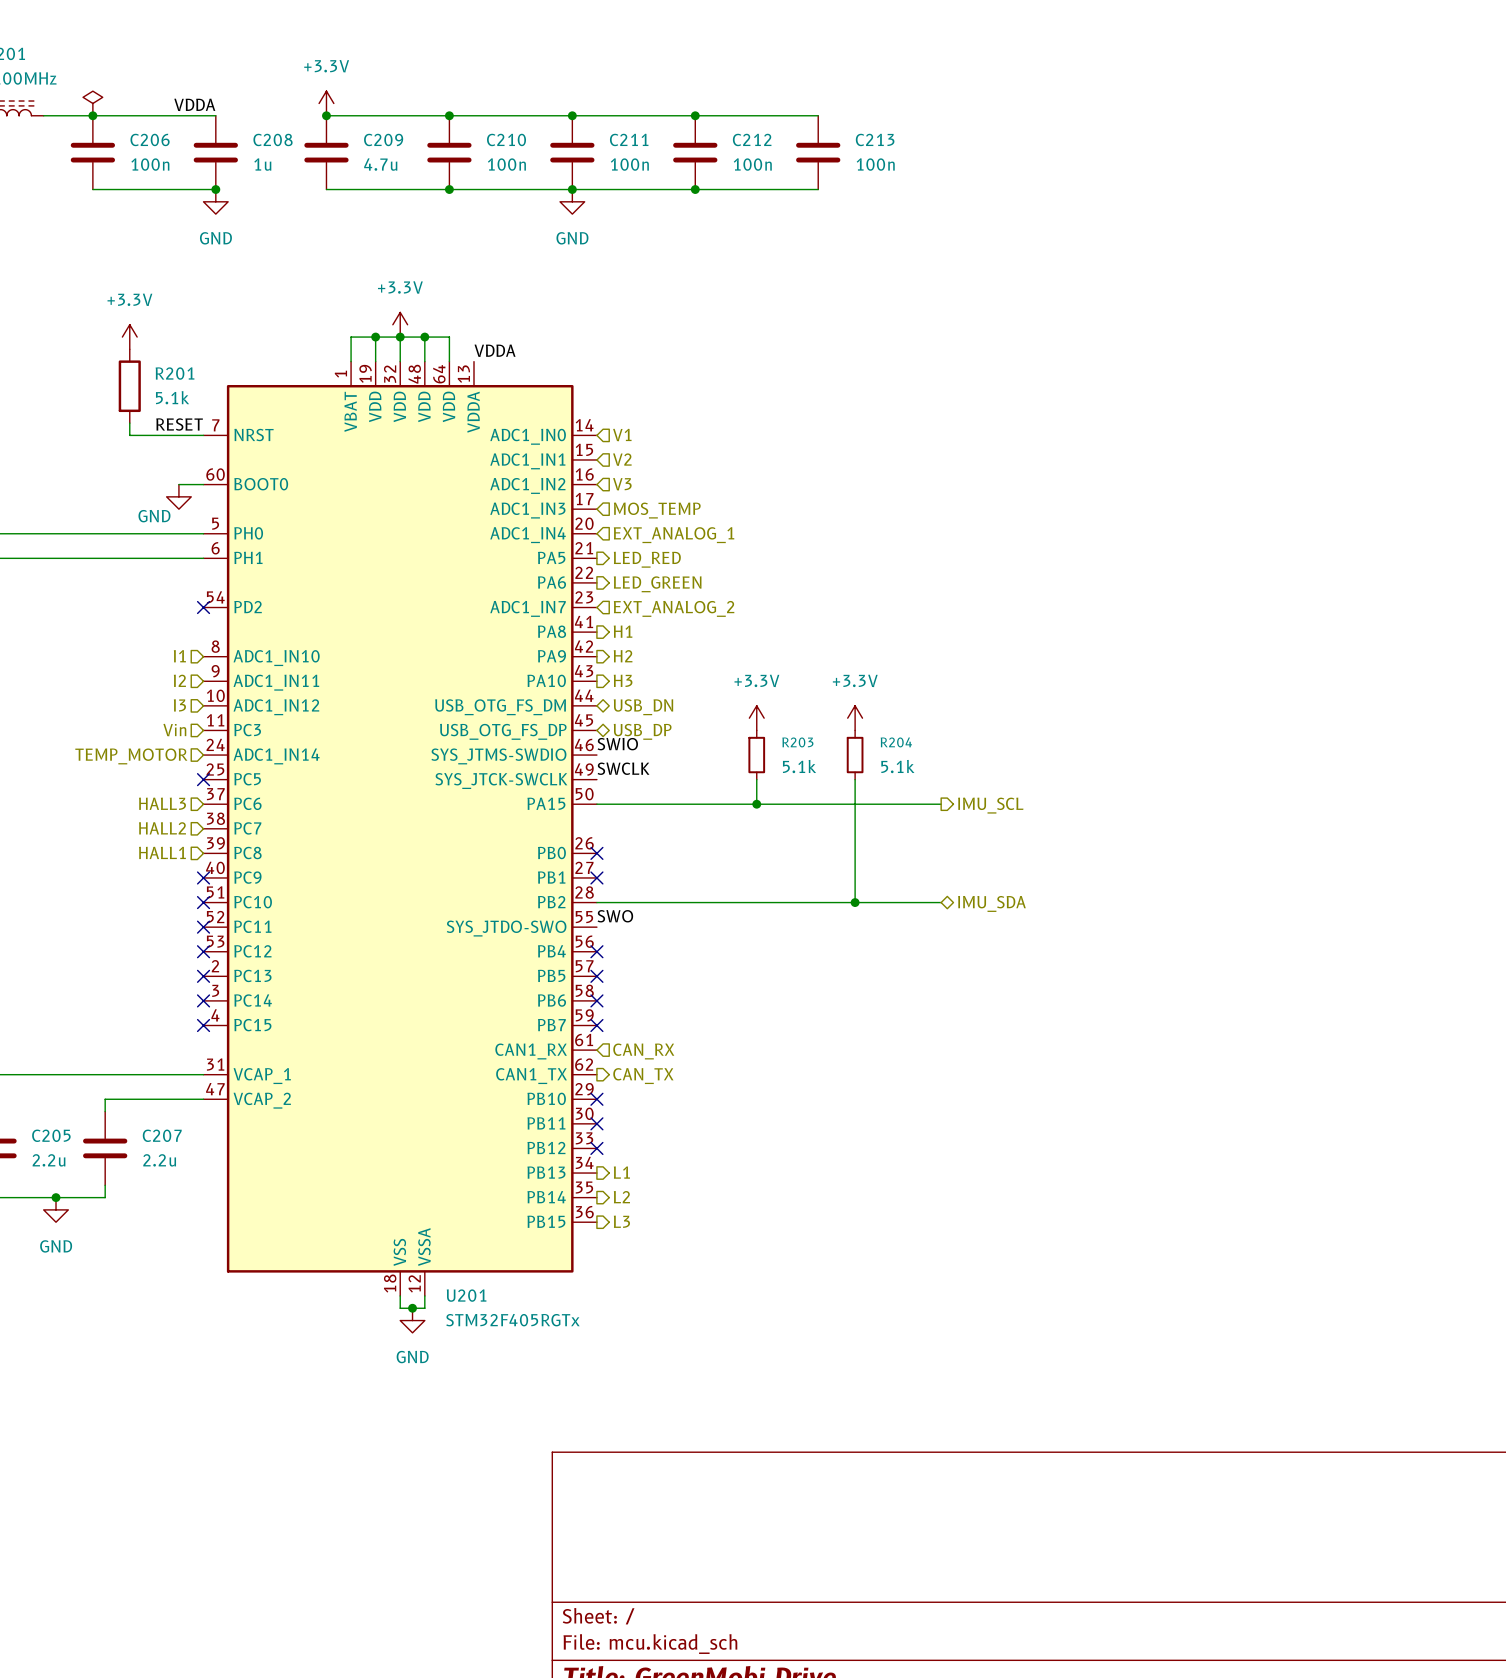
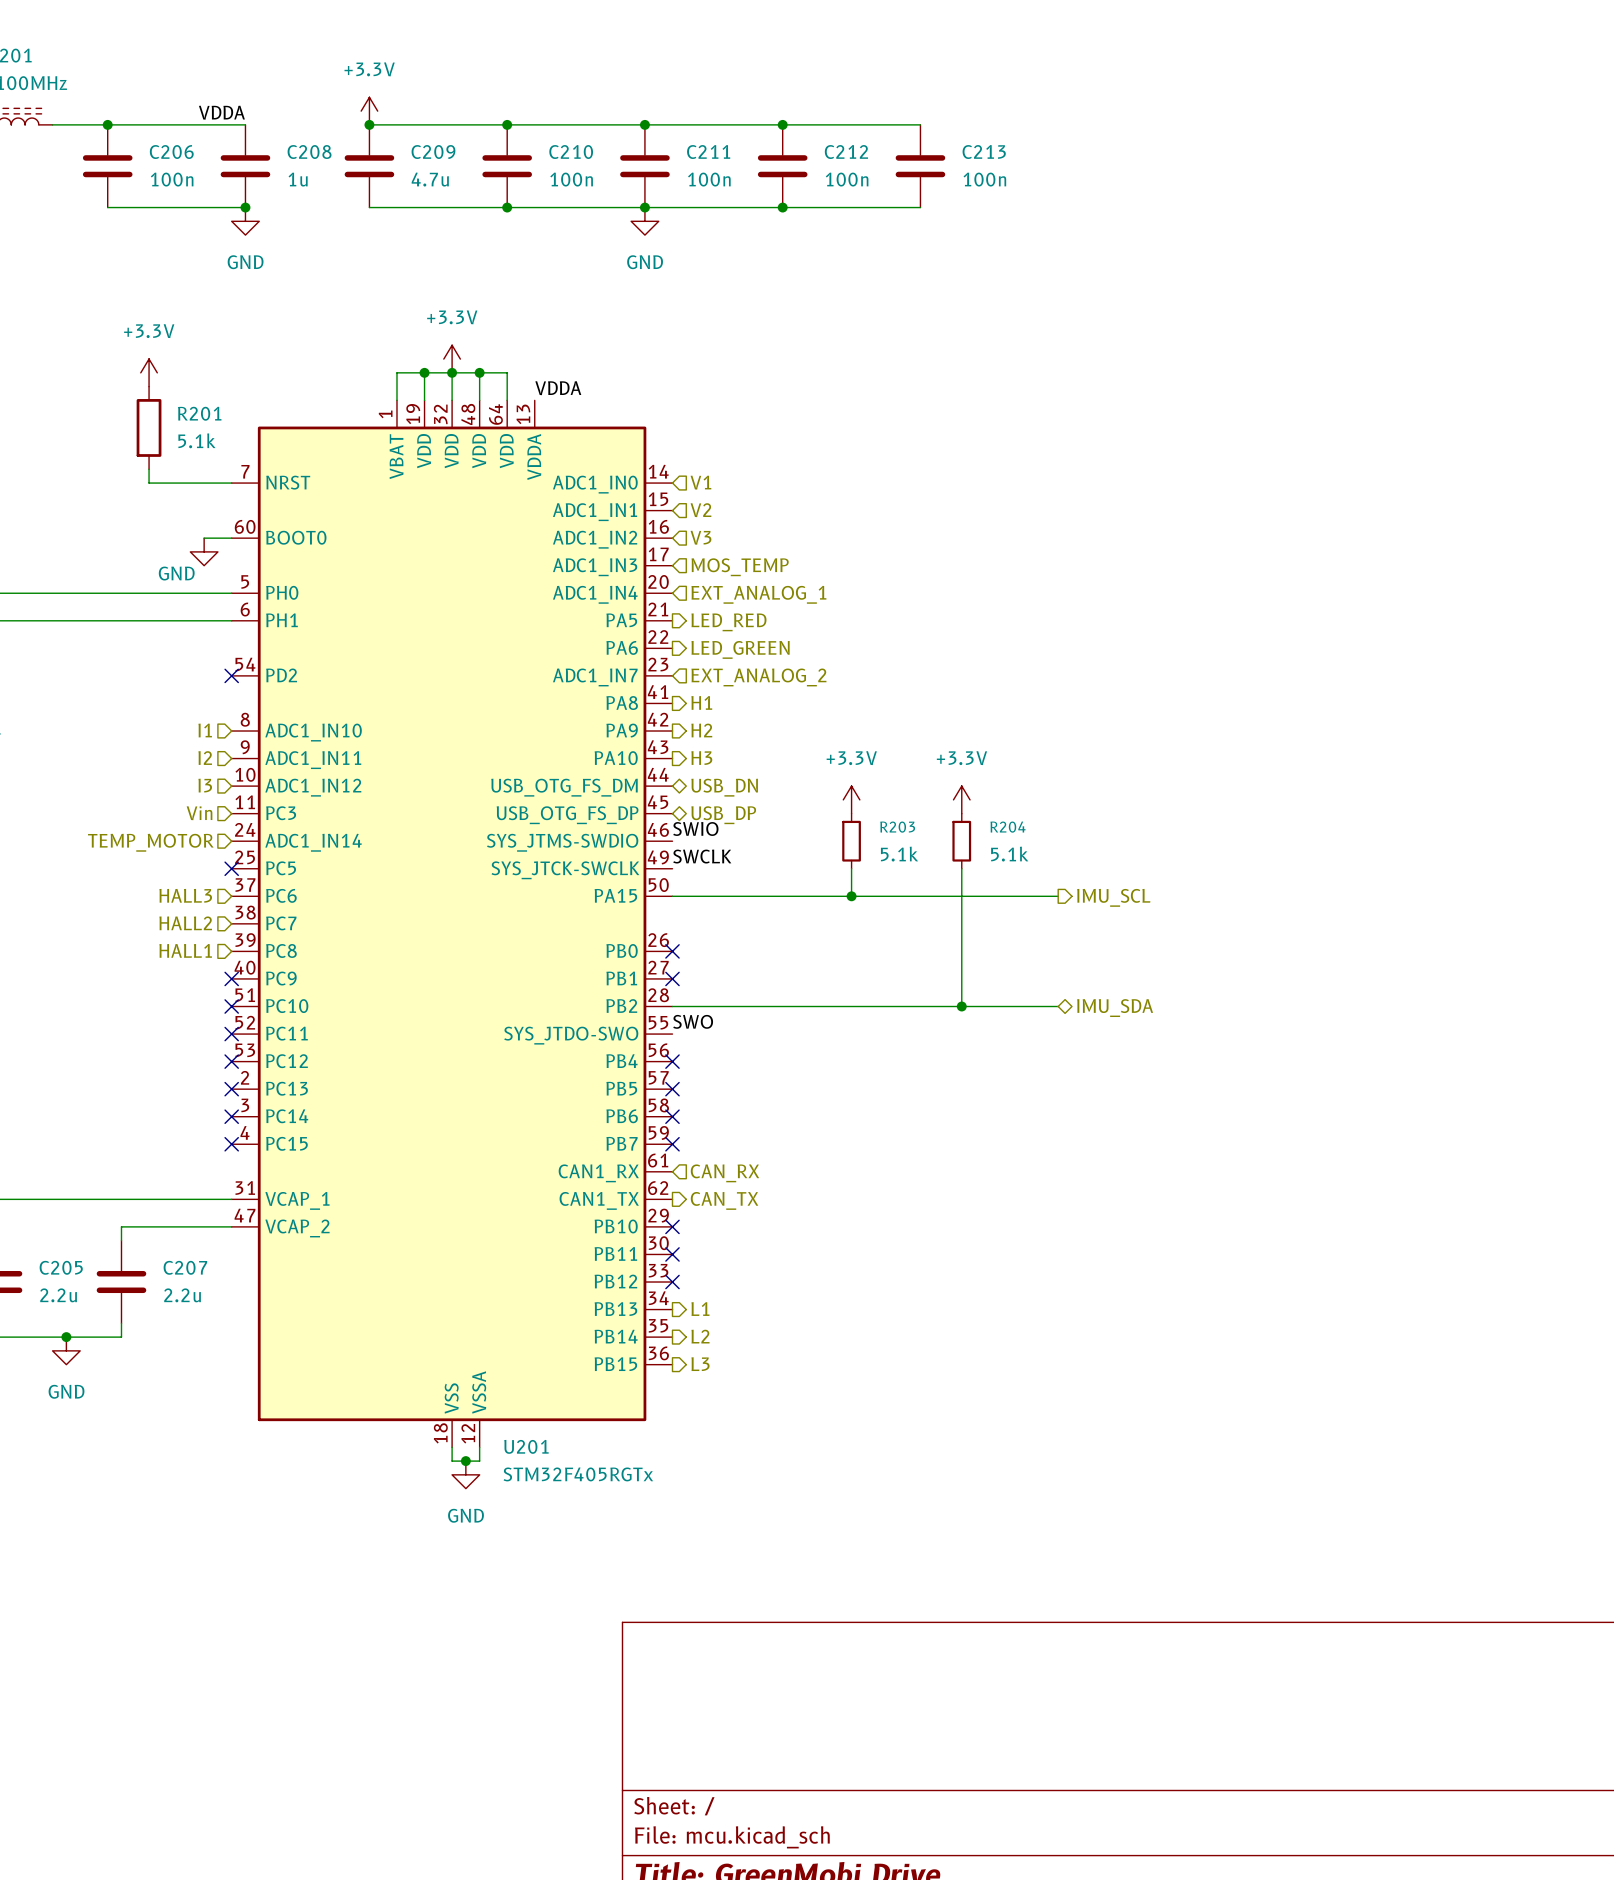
power symbol: (92, 103) -> none
label: RESET (179, 424) -> none

